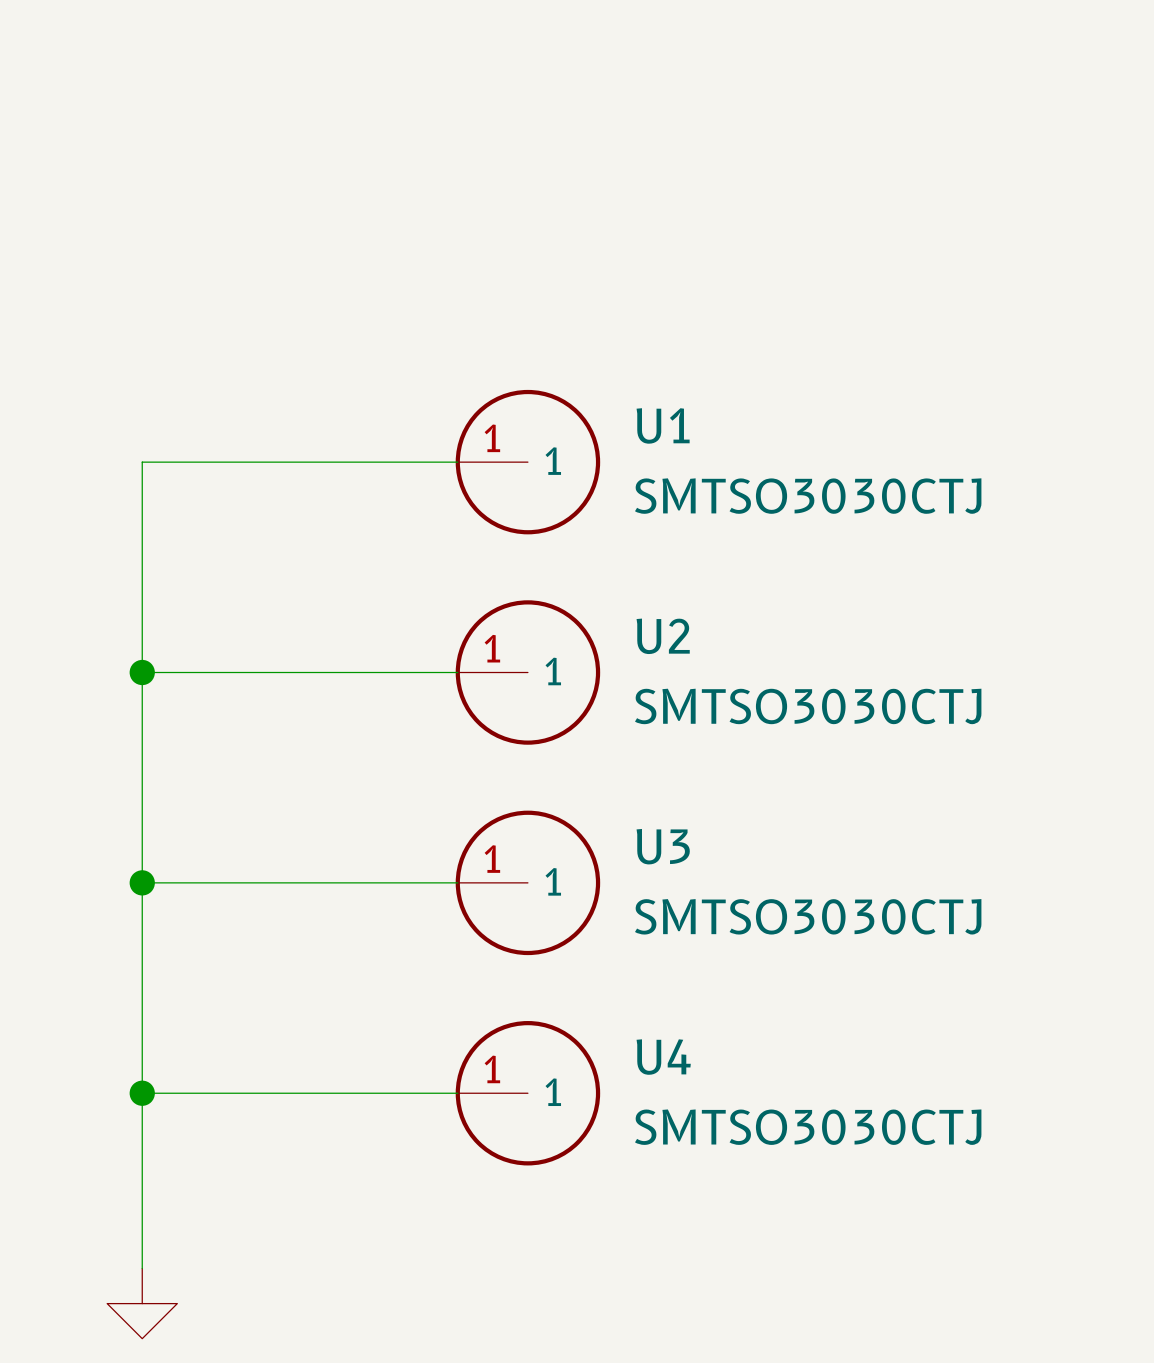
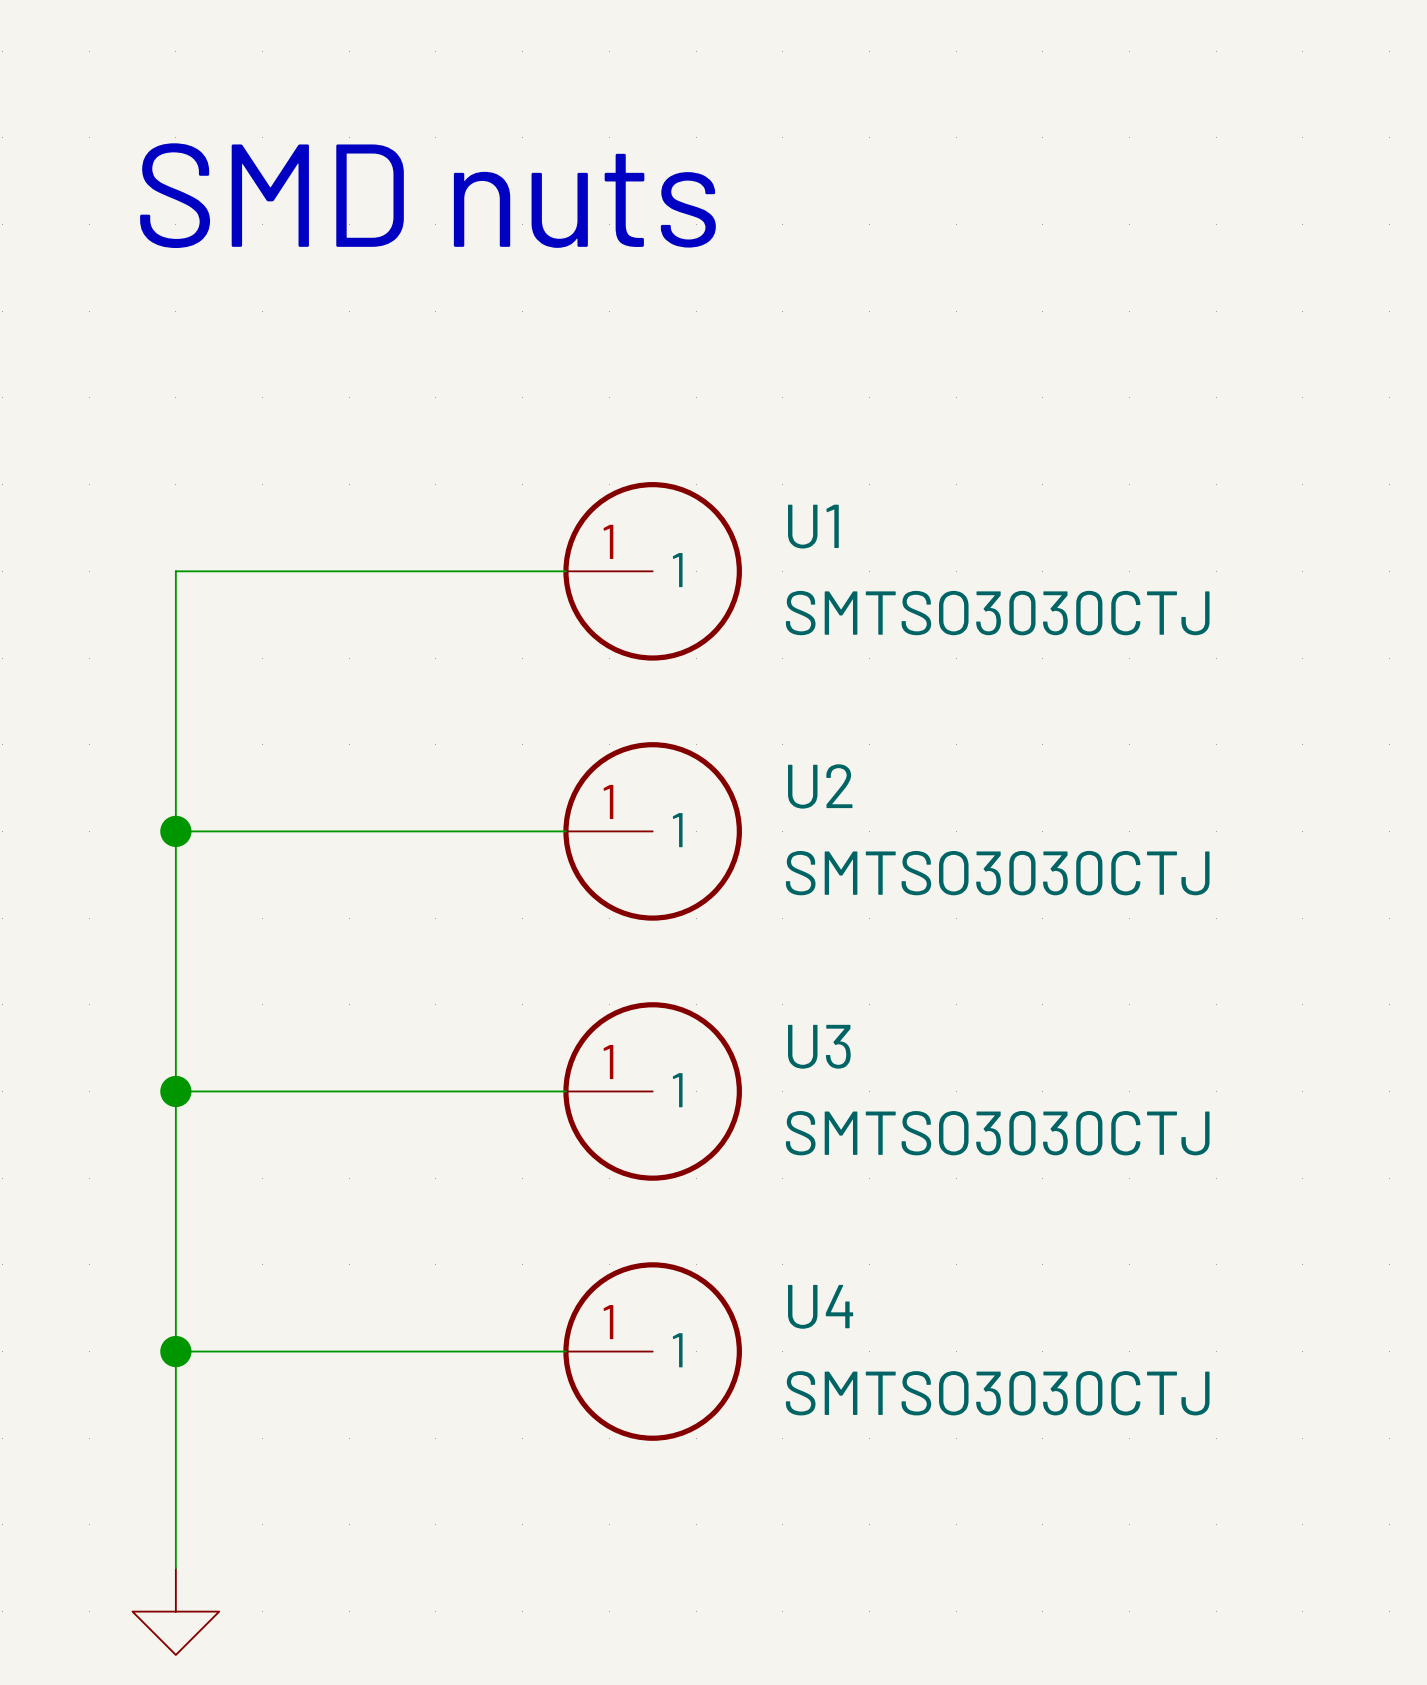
text: none -> SMD nuts (427, 195)

